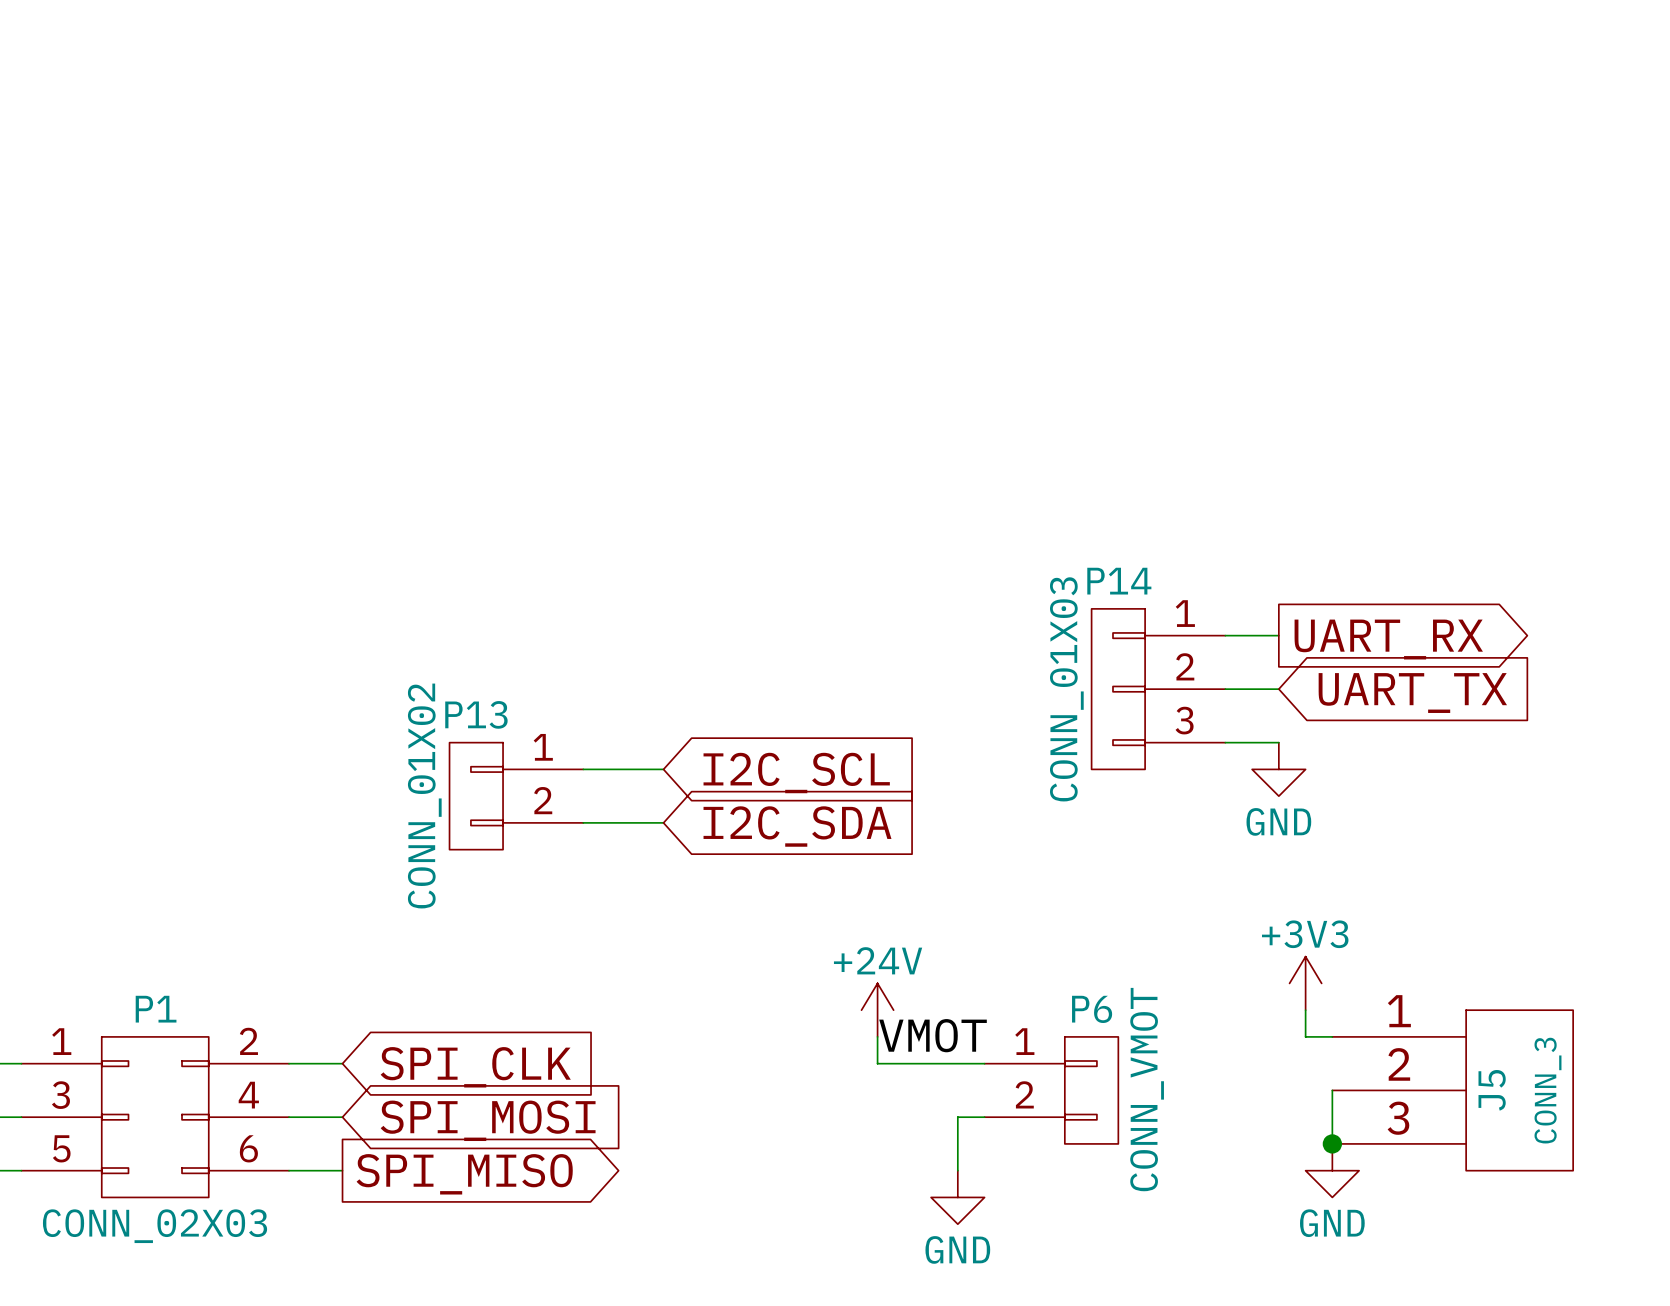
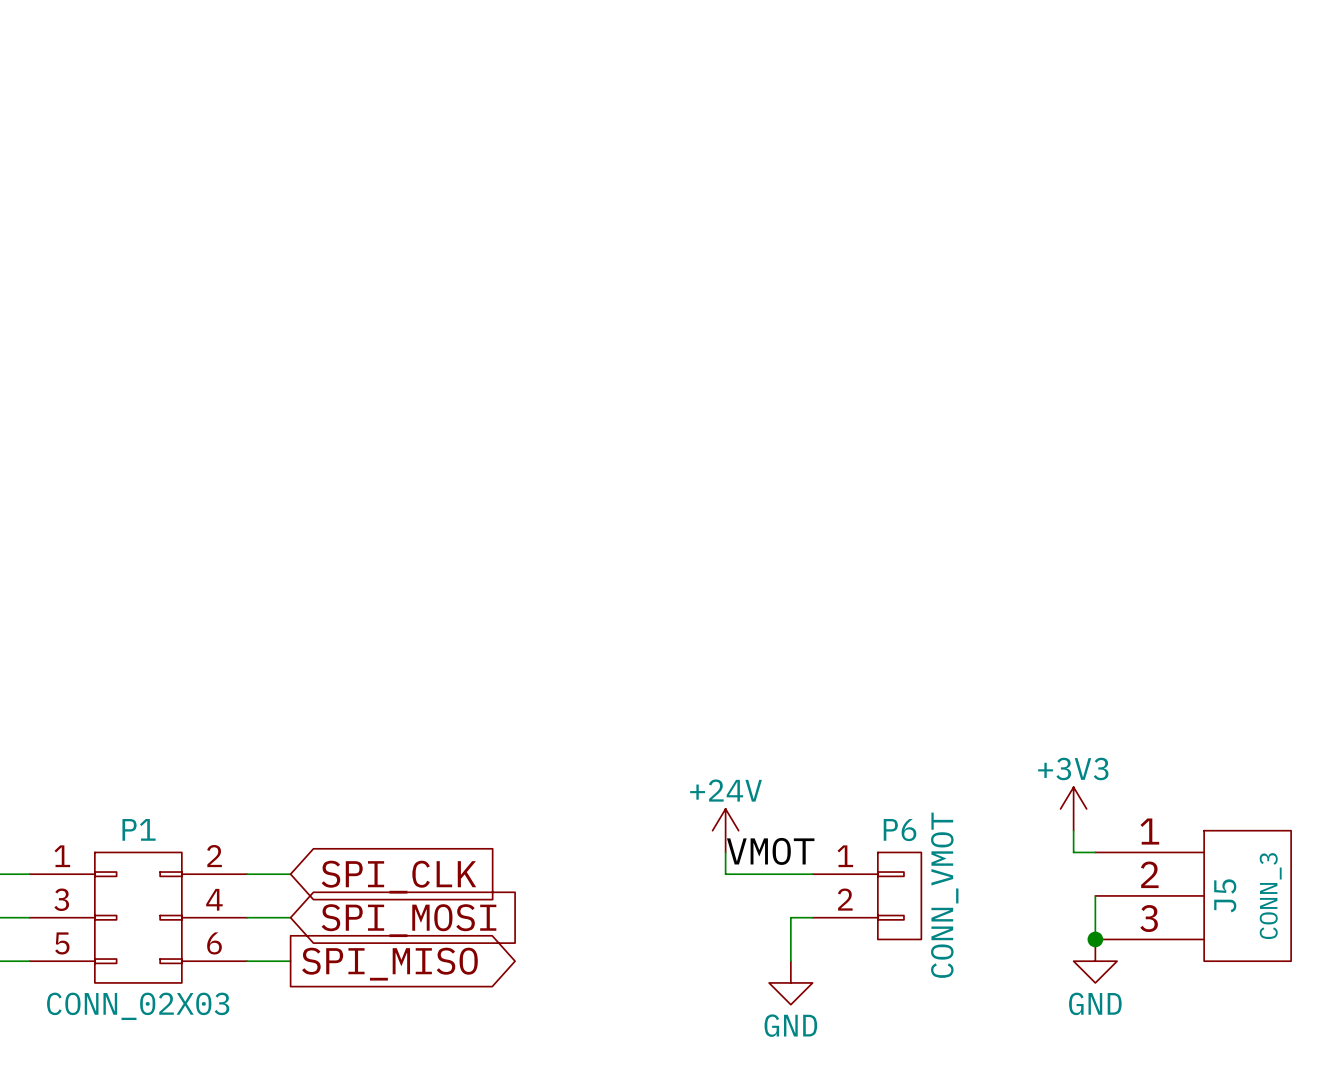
wire: (1225, 635) (1278, 635) -> none
global label: UART_RX (1388, 639) -> none
P14: CONN_01X03 (1158, 689) -> none
wire: (1225, 689) (1278, 689) -> none
global label: UART_TX (1412, 693) -> none
wire: (1225, 742) (1278, 742) -> none
wire: (583, 769) (663, 769) -> none
power symbol: GND (1278, 769) -> none
global label: I2C_SCL (796, 773) -> none
P13: CONN_01X02 (516, 796) -> none
wire: (583, 822) (663, 822) -> none
global label: I2C_SDA (797, 826) -> none

